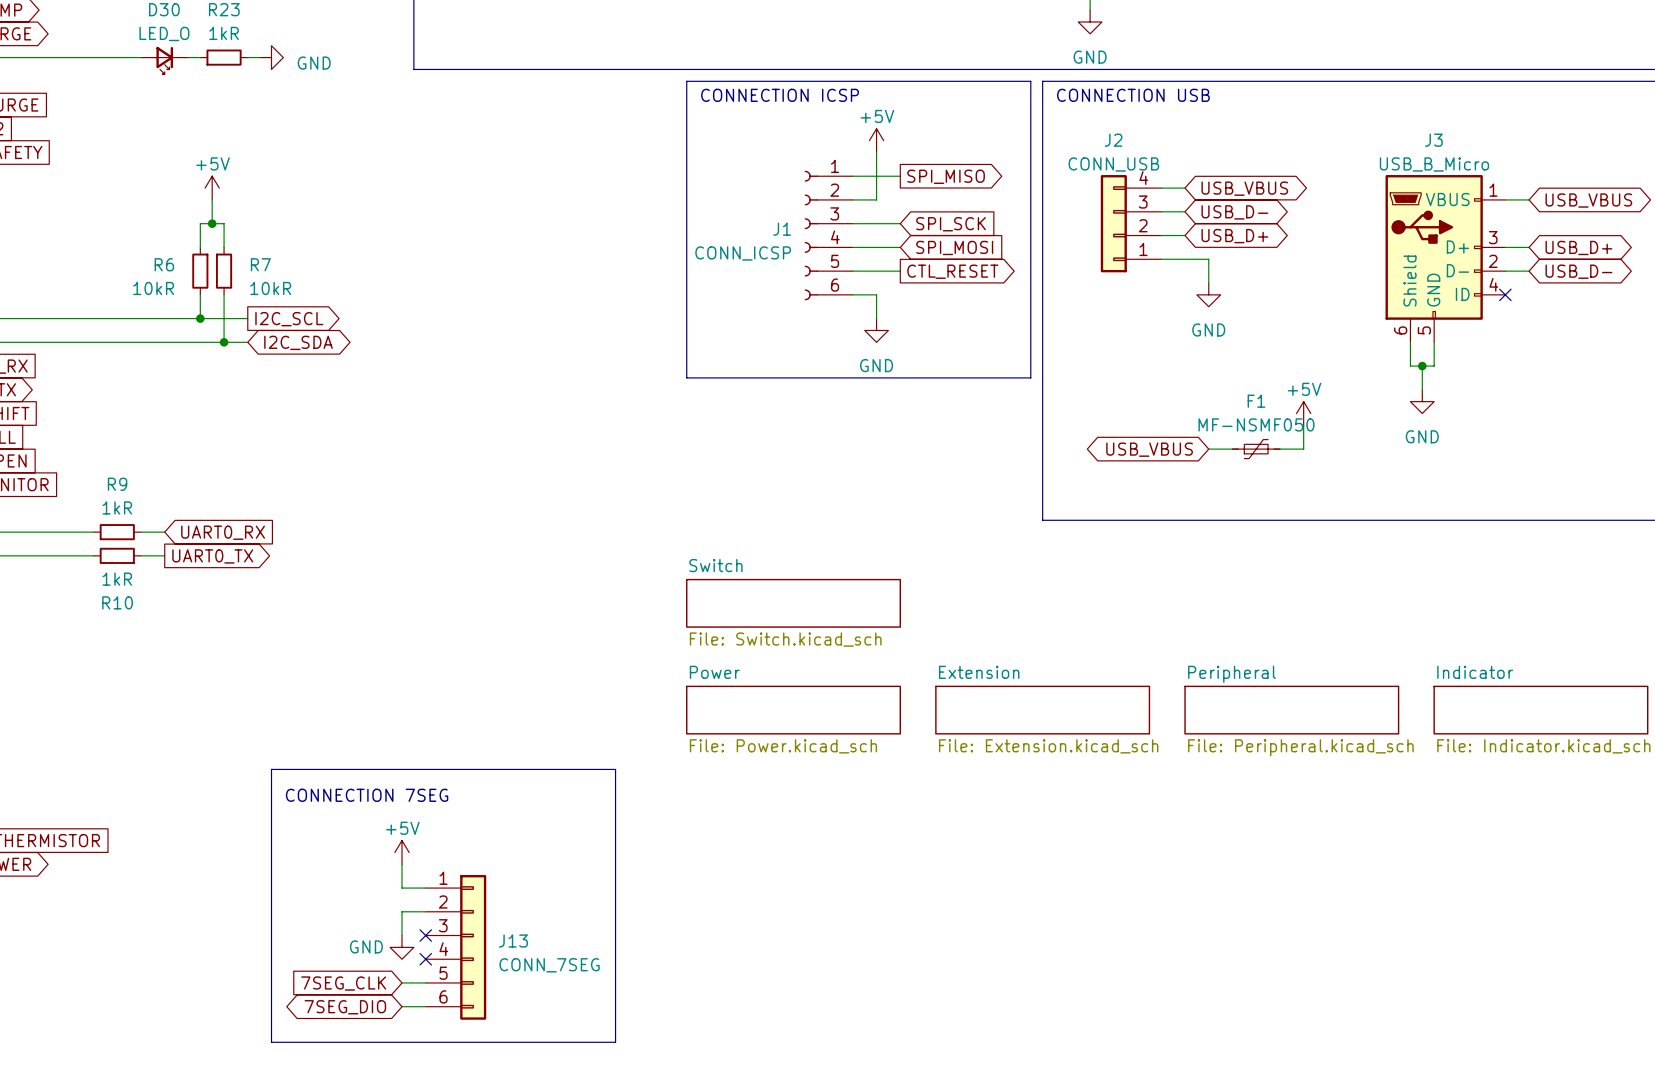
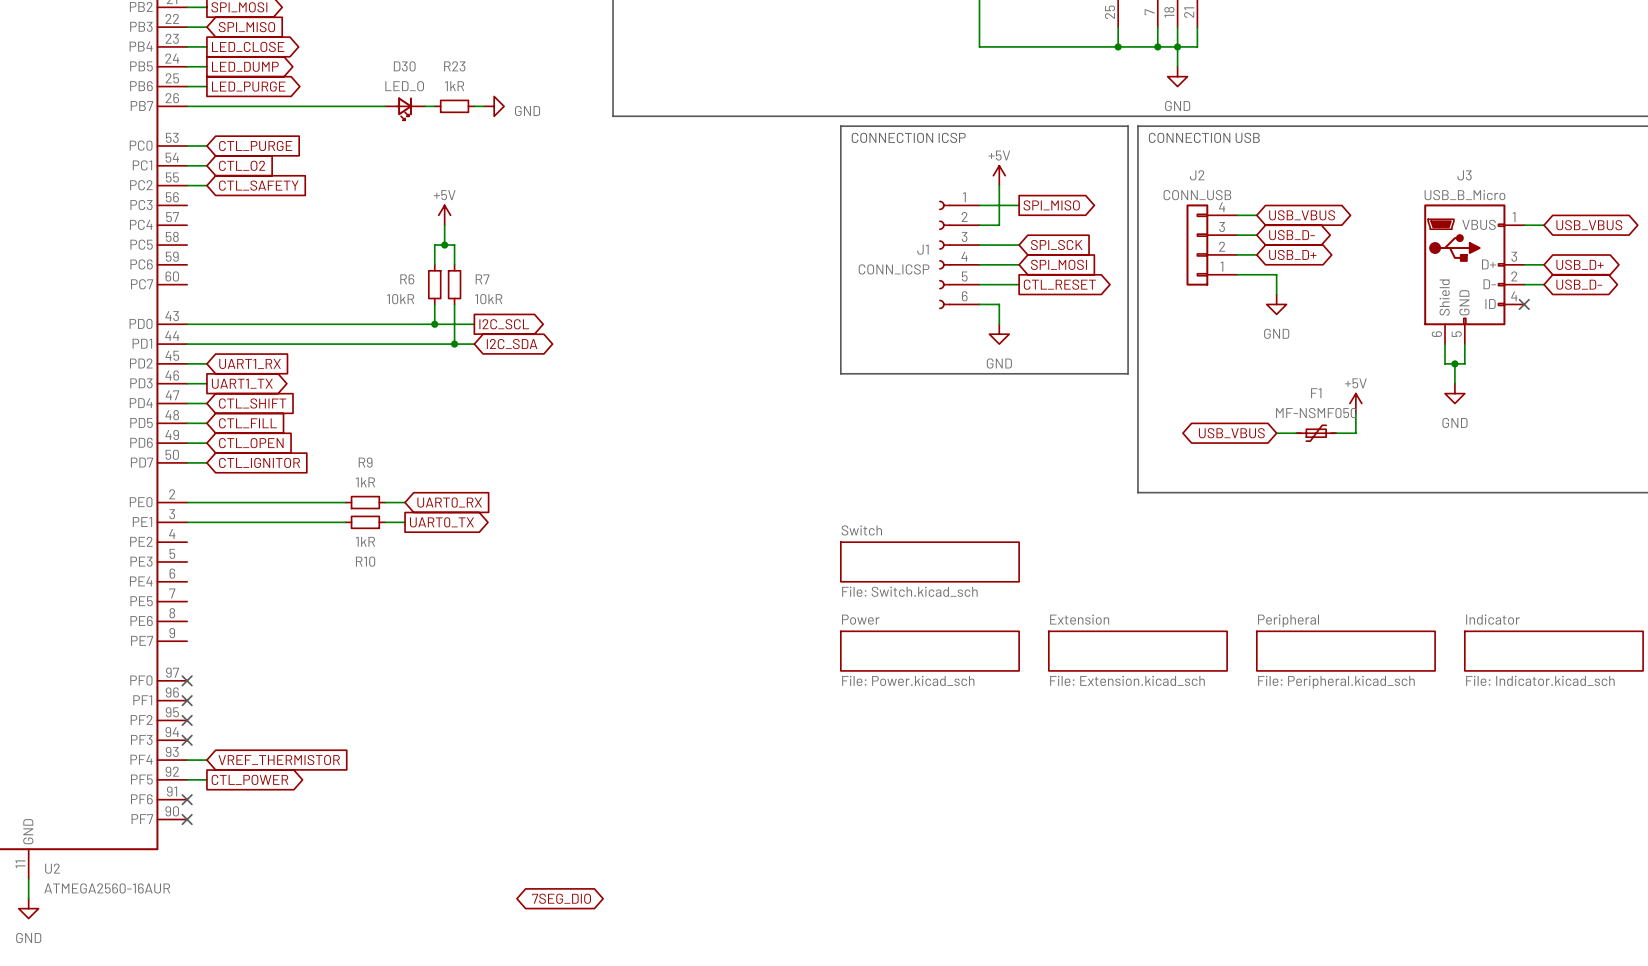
line: (271, 769) (615, 769) (615, 1042) (271, 1042) (271, 769) -> none
text: CONNECTION 7SEG (367, 795) -> none
power symbol: +5V (402, 852) -> none
wire: (402, 864) (402, 888) (425, 888) -> none
wire: (425, 911) (402, 911) (402, 935) -> none
no-connect mark: (425, 935) -> none
power symbol: GND (402, 947) -> none
J13: CONN_7SEG (455, 947) -> none
no-connect mark: (425, 959) -> none
wire: (402, 982) (425, 982) -> none
global label: 7SEG_CLK (343, 983) -> none
wire: (402, 1006) (425, 1006) -> none

